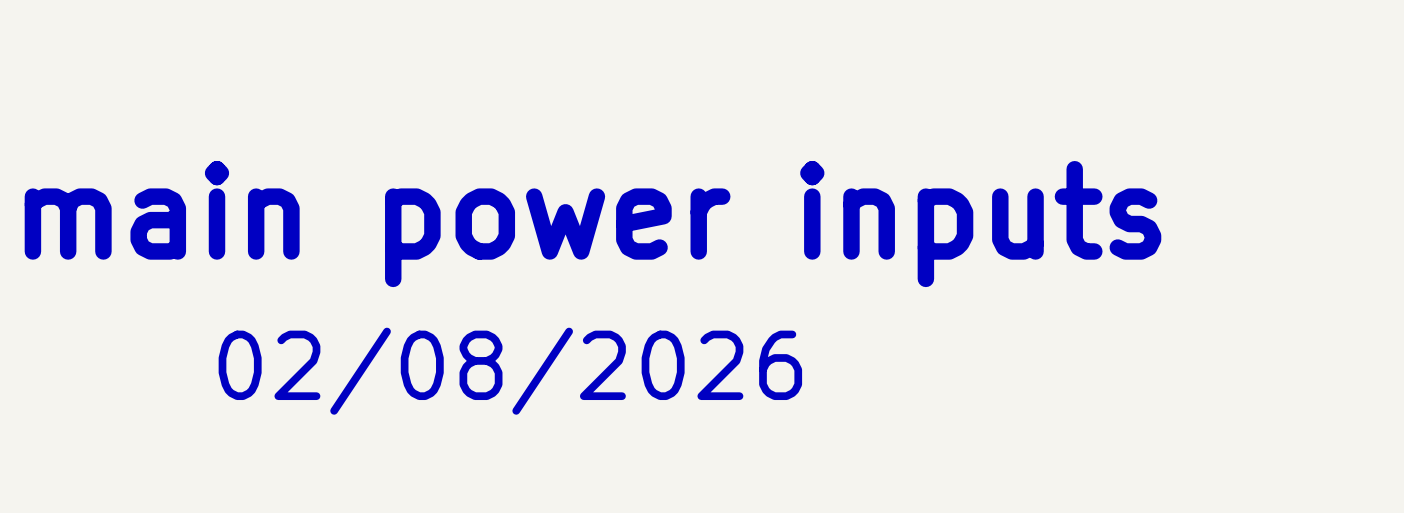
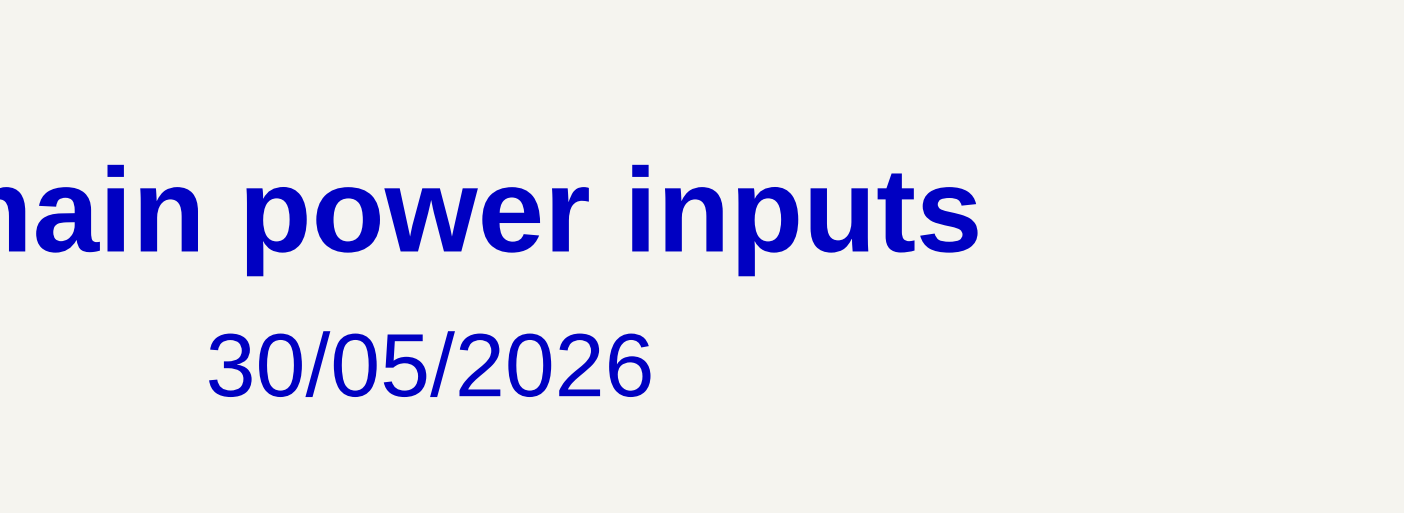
text: 02/08/2026 (510, 371) -> 30/05/2026 (429, 364)

